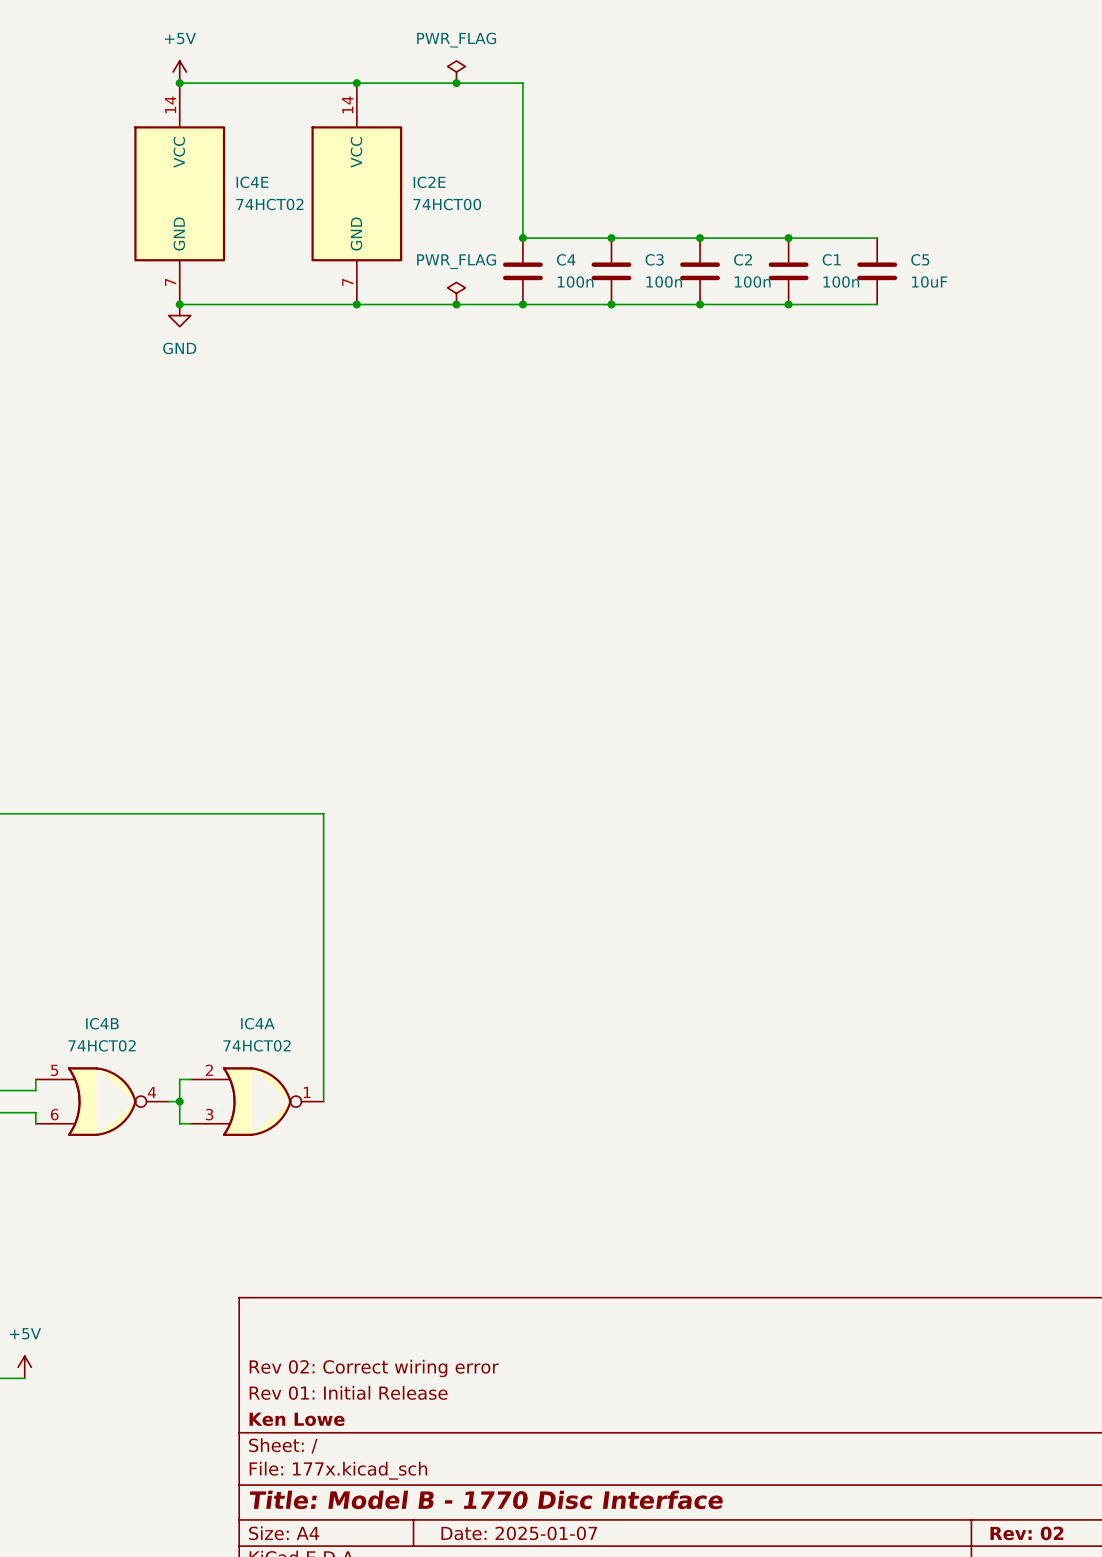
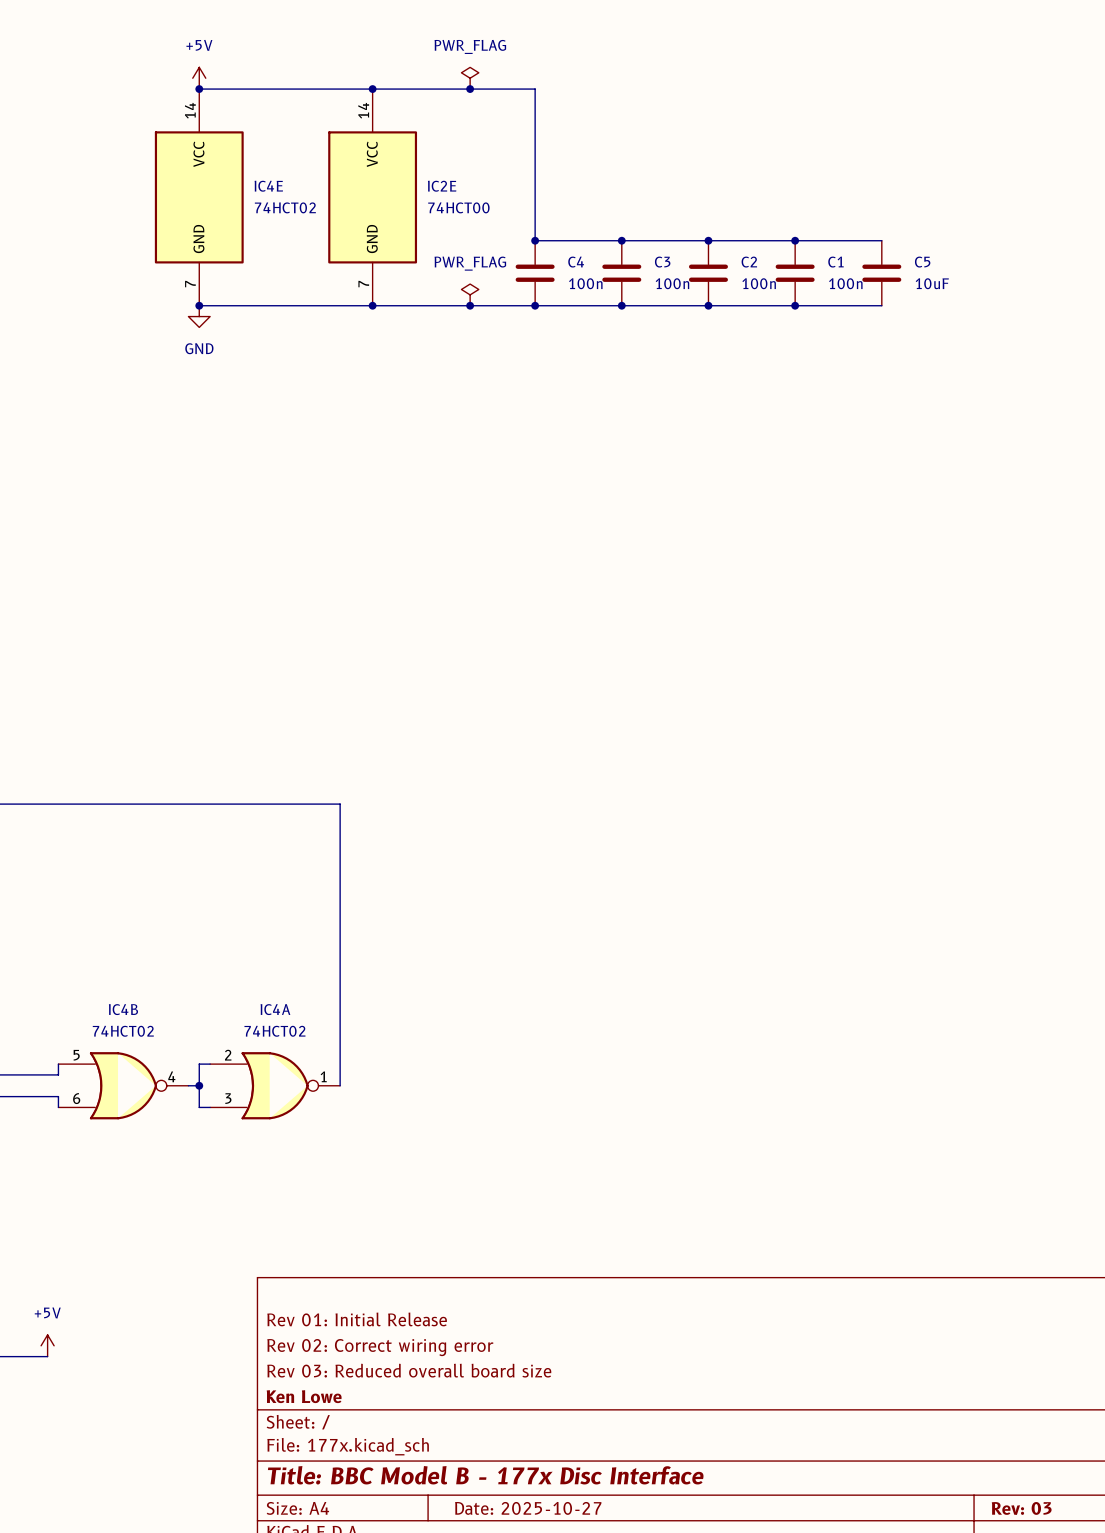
title block: none -> Rev 01: Initial Release (357, 1319)
title block: Rev 01: Initial Release (348, 1392) -> Rev 03: Reduced overall board size (409, 1370)
title block: Title: Model B - 1770 Disc Interface (486, 1499) -> Title: BBC Model B - 177x Disc Interface (485, 1475)
title block: Date: 2025-01-07 (519, 1533) -> Date: 2025-10-27 (528, 1508)
title block: Rev: 02 (1026, 1533) -> Rev: 03 (1021, 1508)

